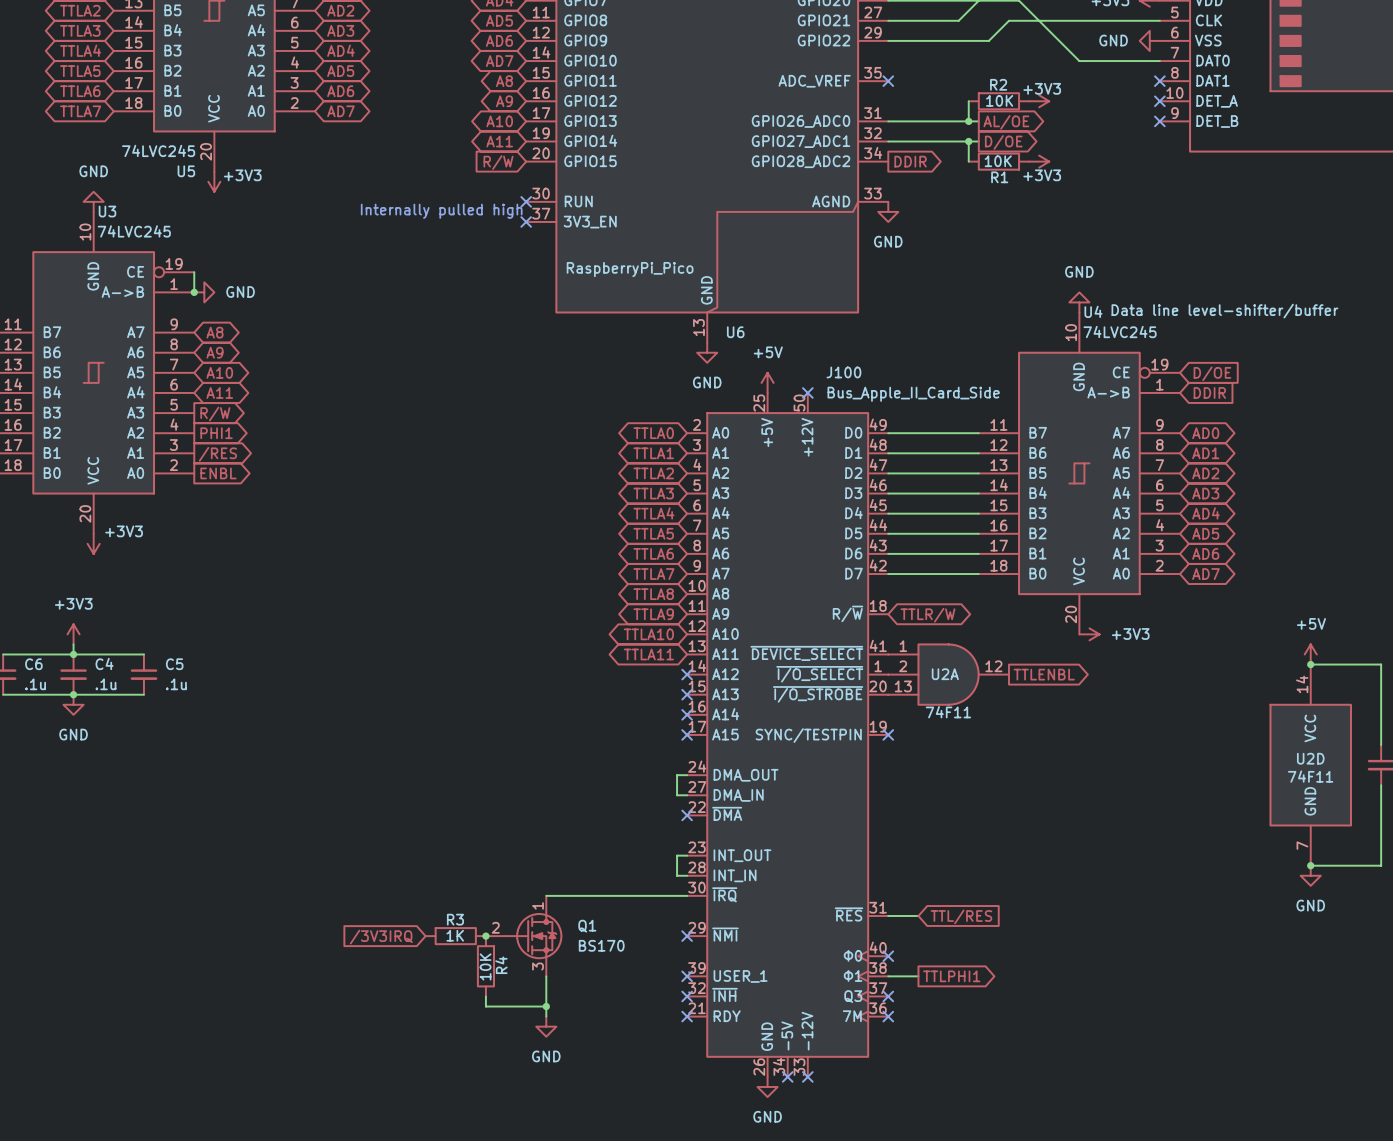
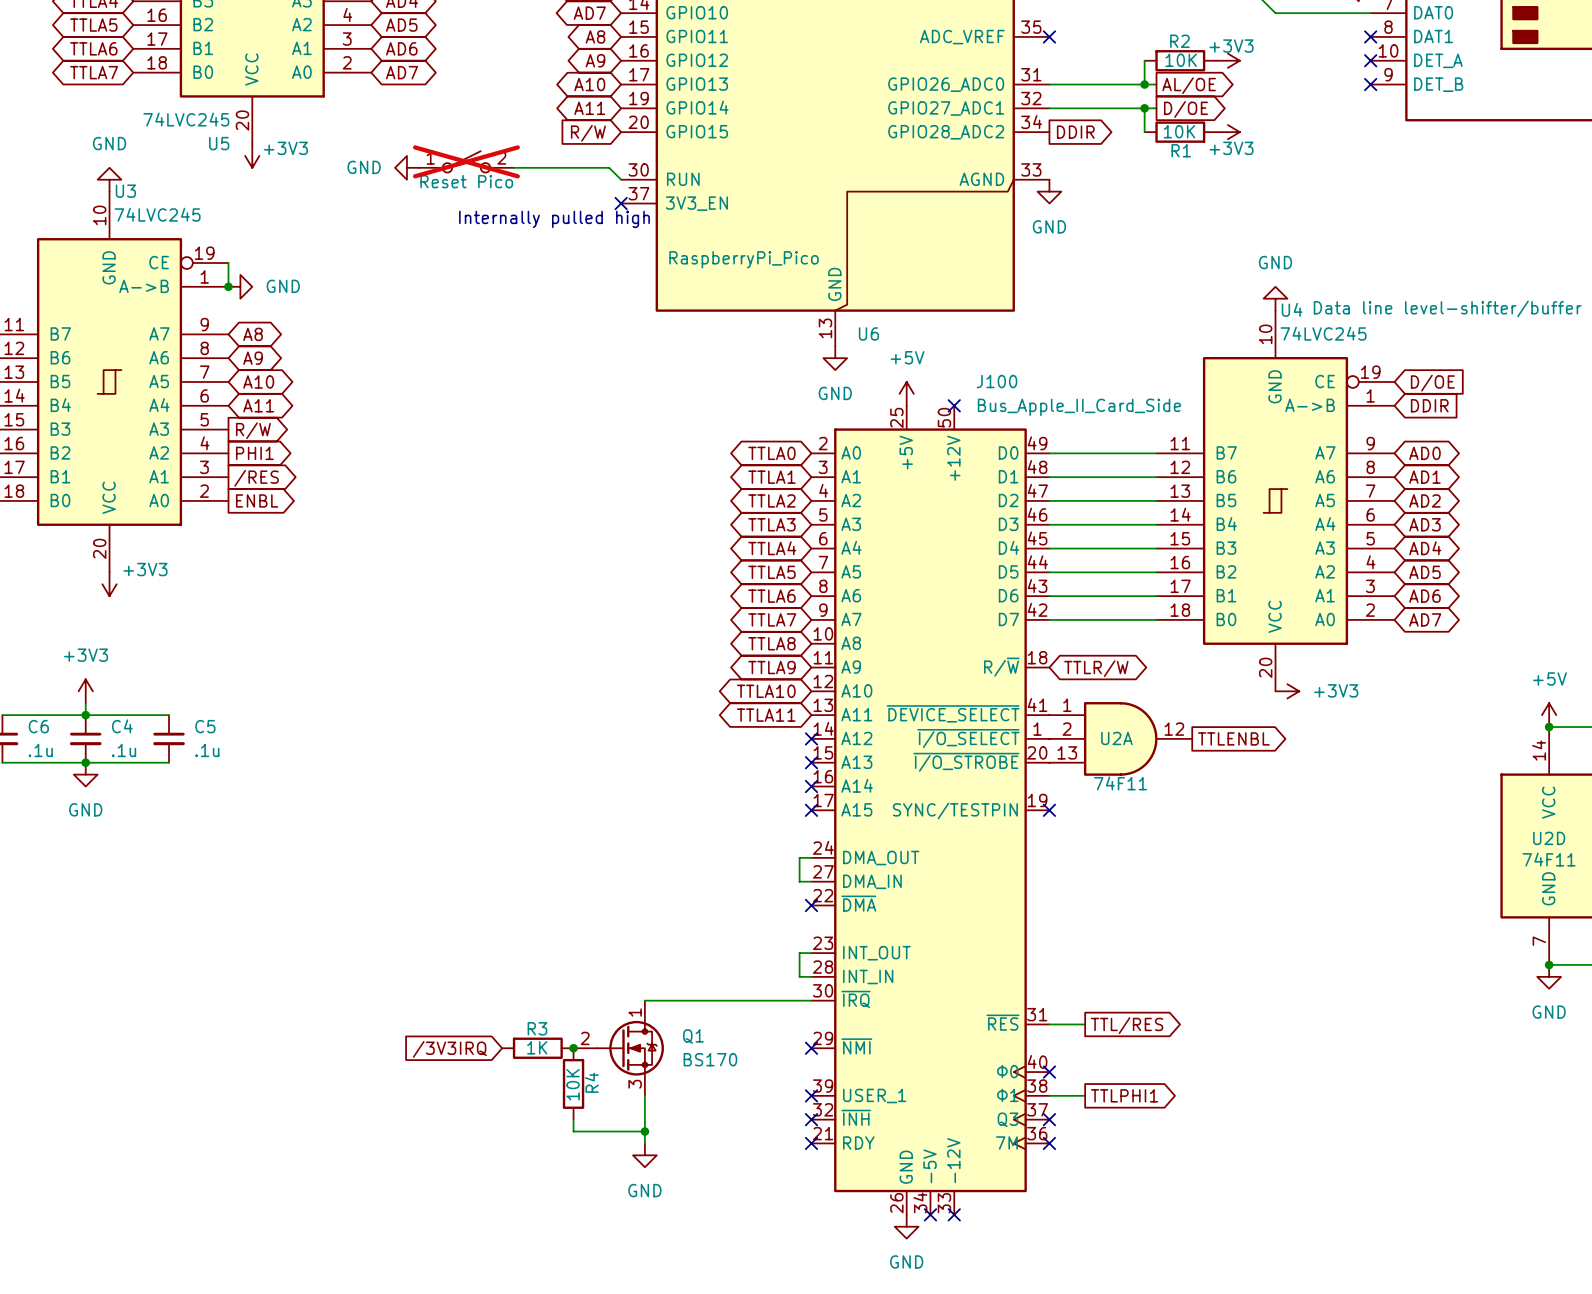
part: none -> (466, 161)
power symbol: none -> GND (406, 167)
wire: none -> (514, 167) (609, 167) (621, 179)
no-connect mark: (526, 201) -> none
text position: Internally pulled high (441, 211) -> Internally pulled high (554, 219)
global label shape: input (961, 916) -> output (1127, 1025)

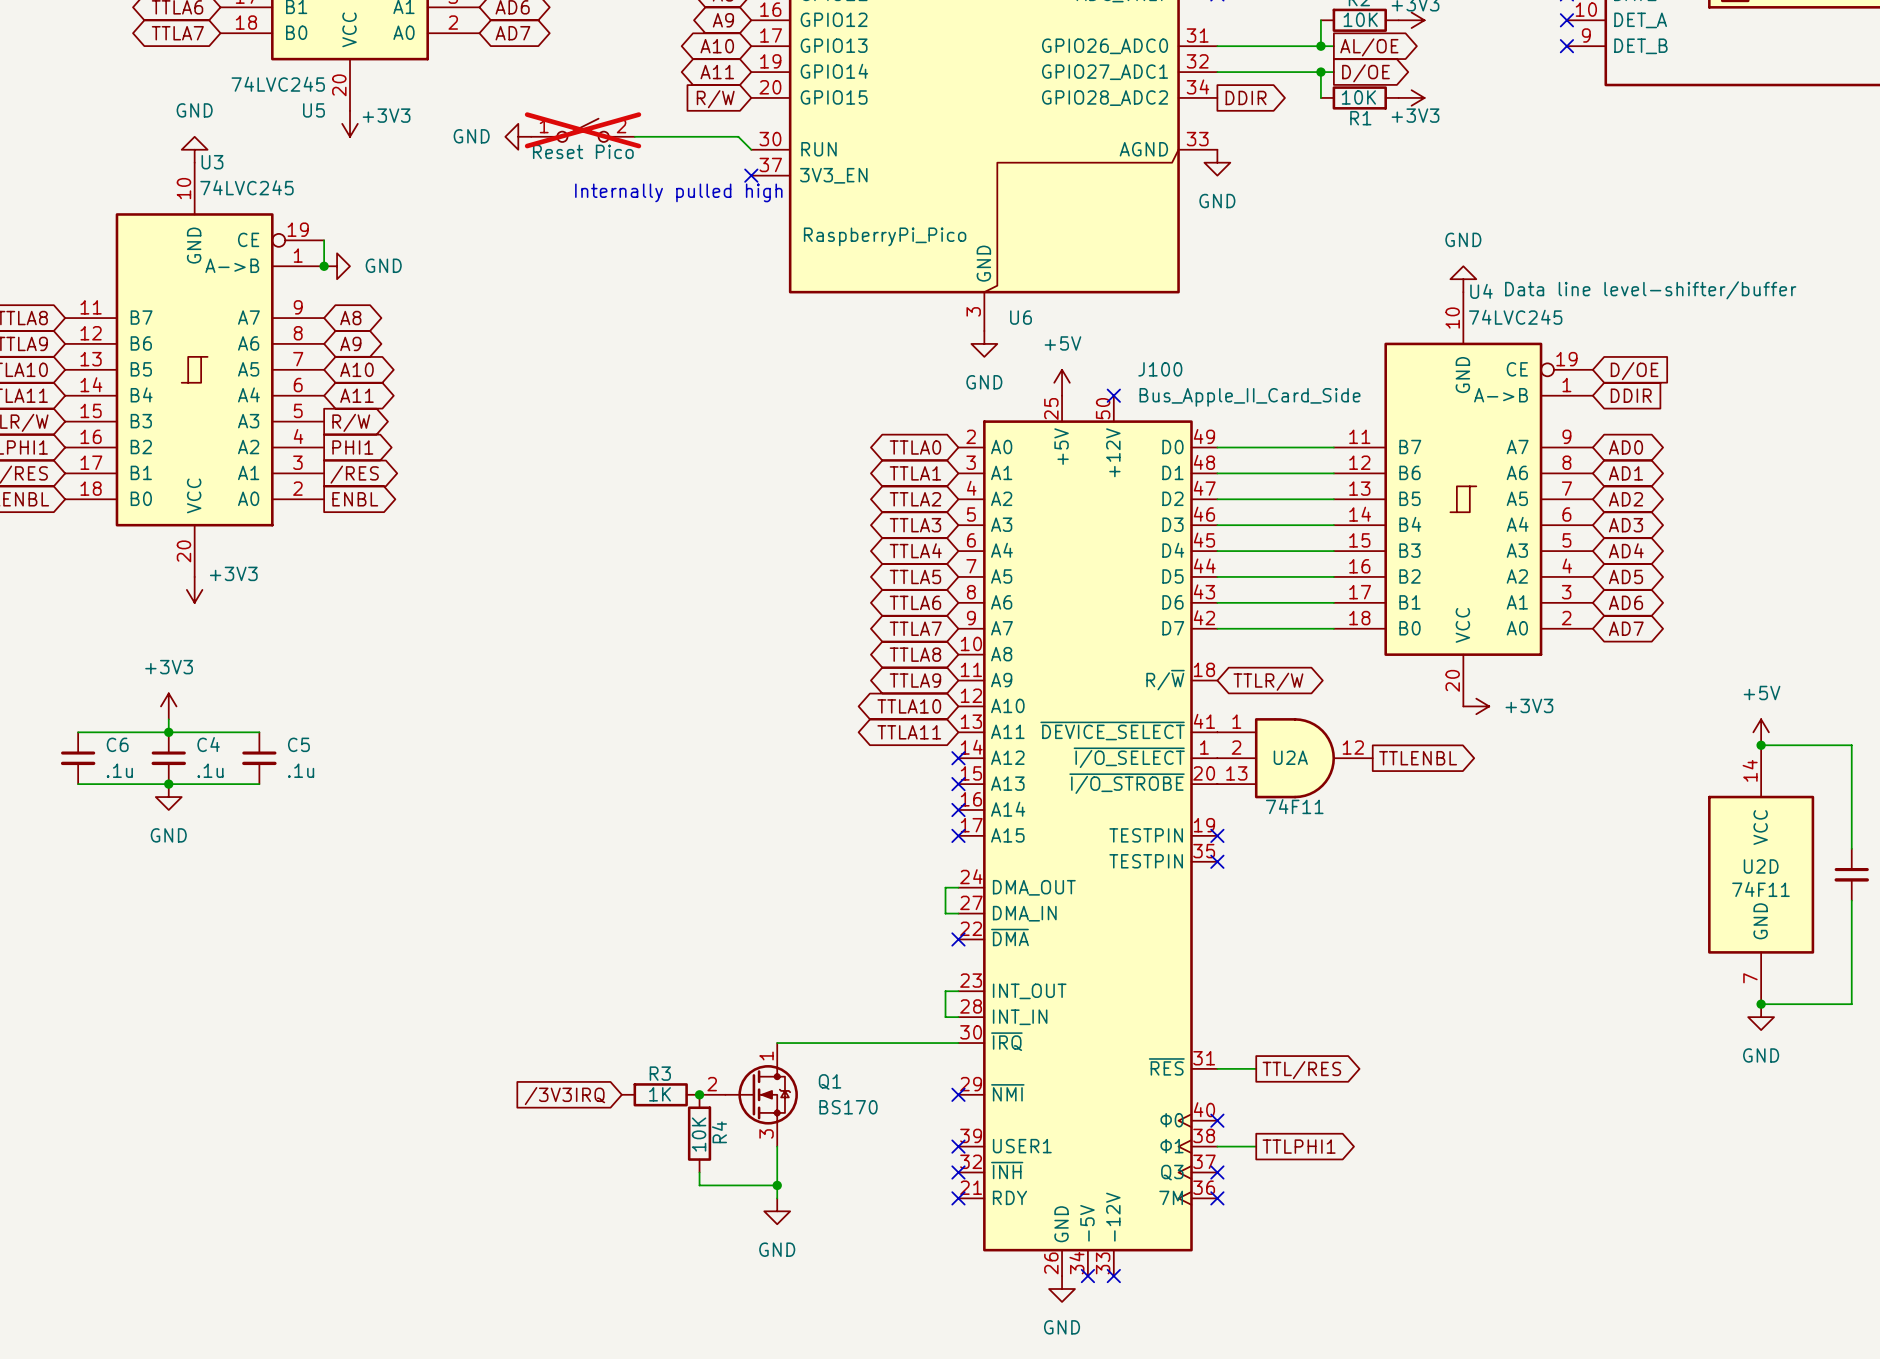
U6 pin number: 13 (825, 328) -> 3 (973, 311)
J100 symbol: [811, 405, 1050, 1215] -> [958, 395, 1218, 1277]
no-connect mark: none -> (1217, 861)

